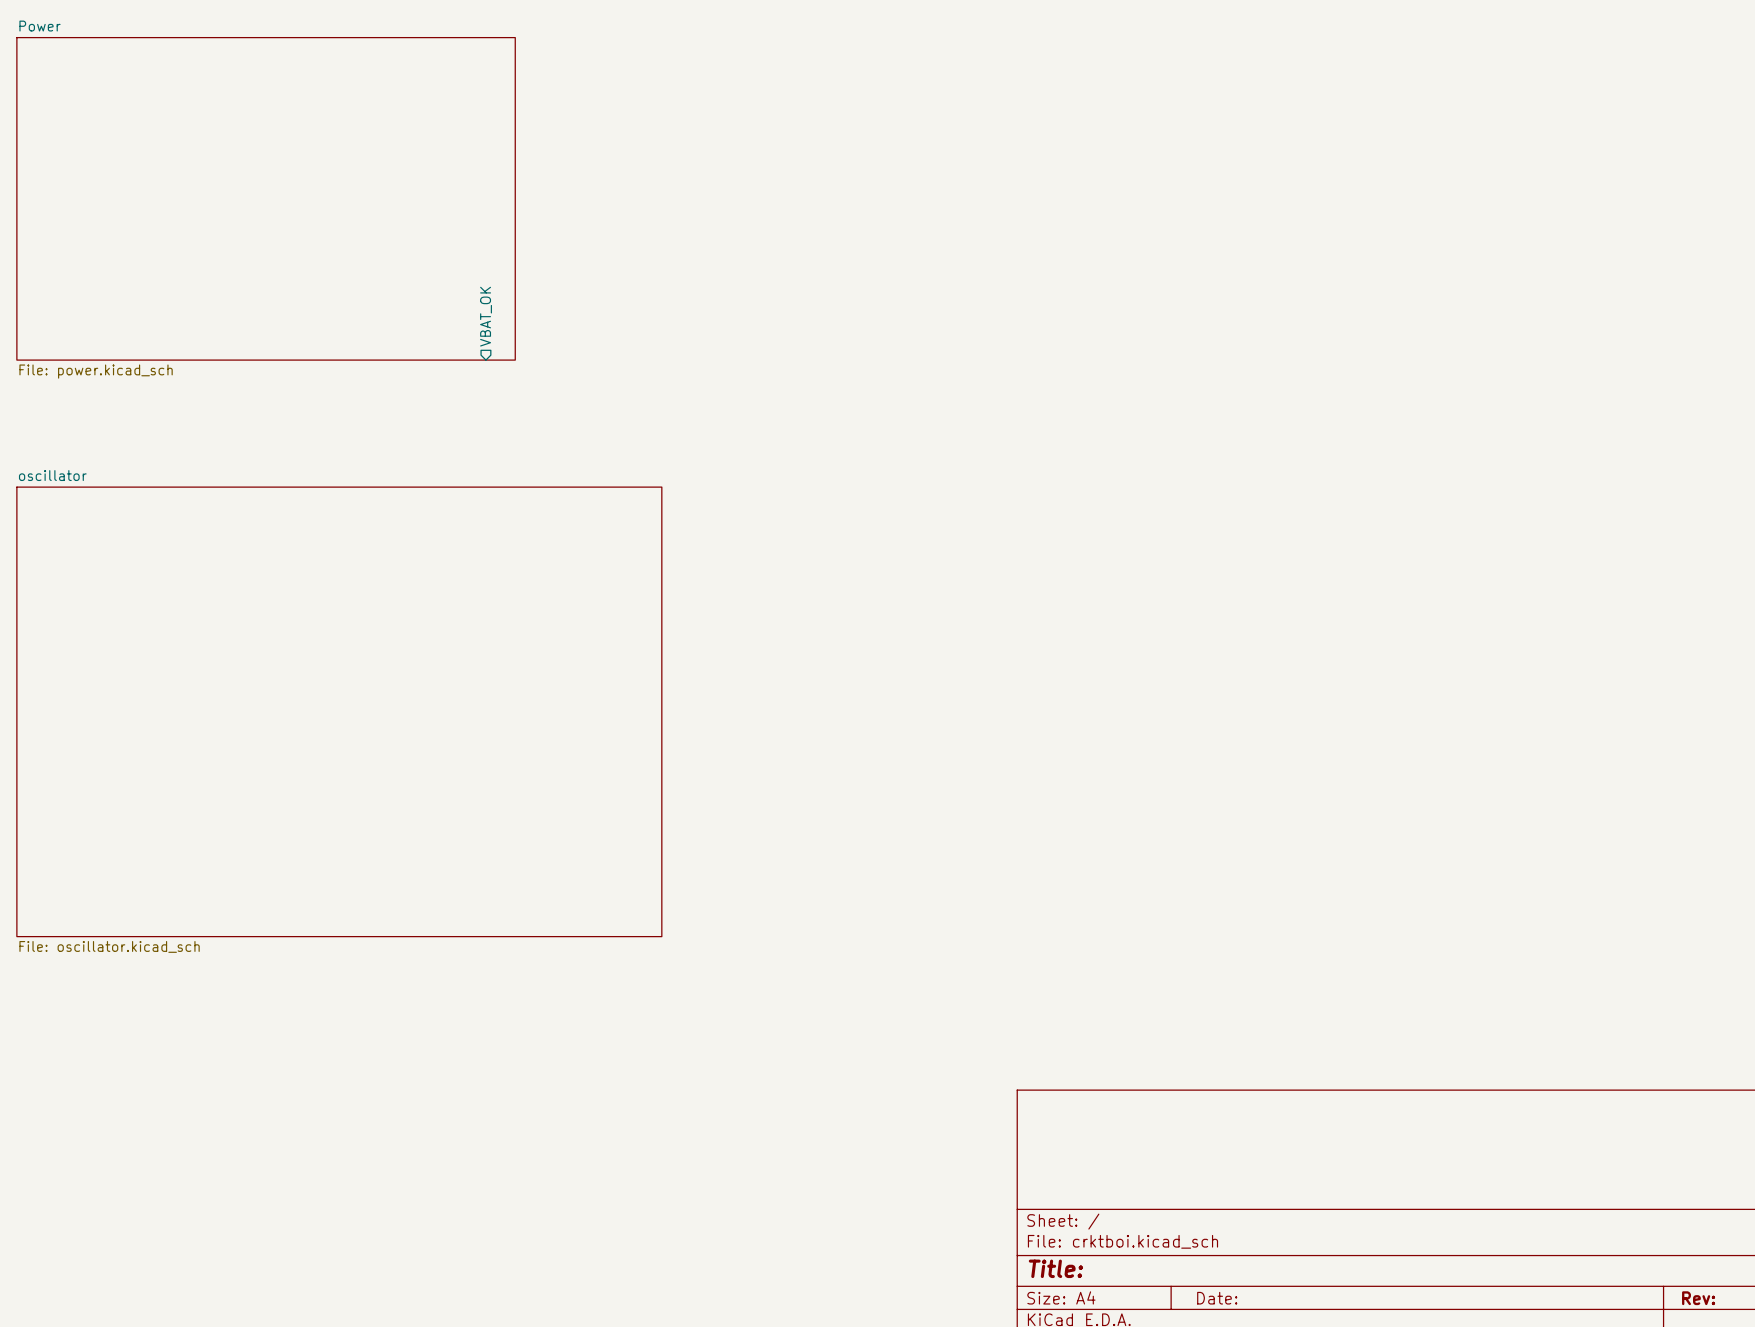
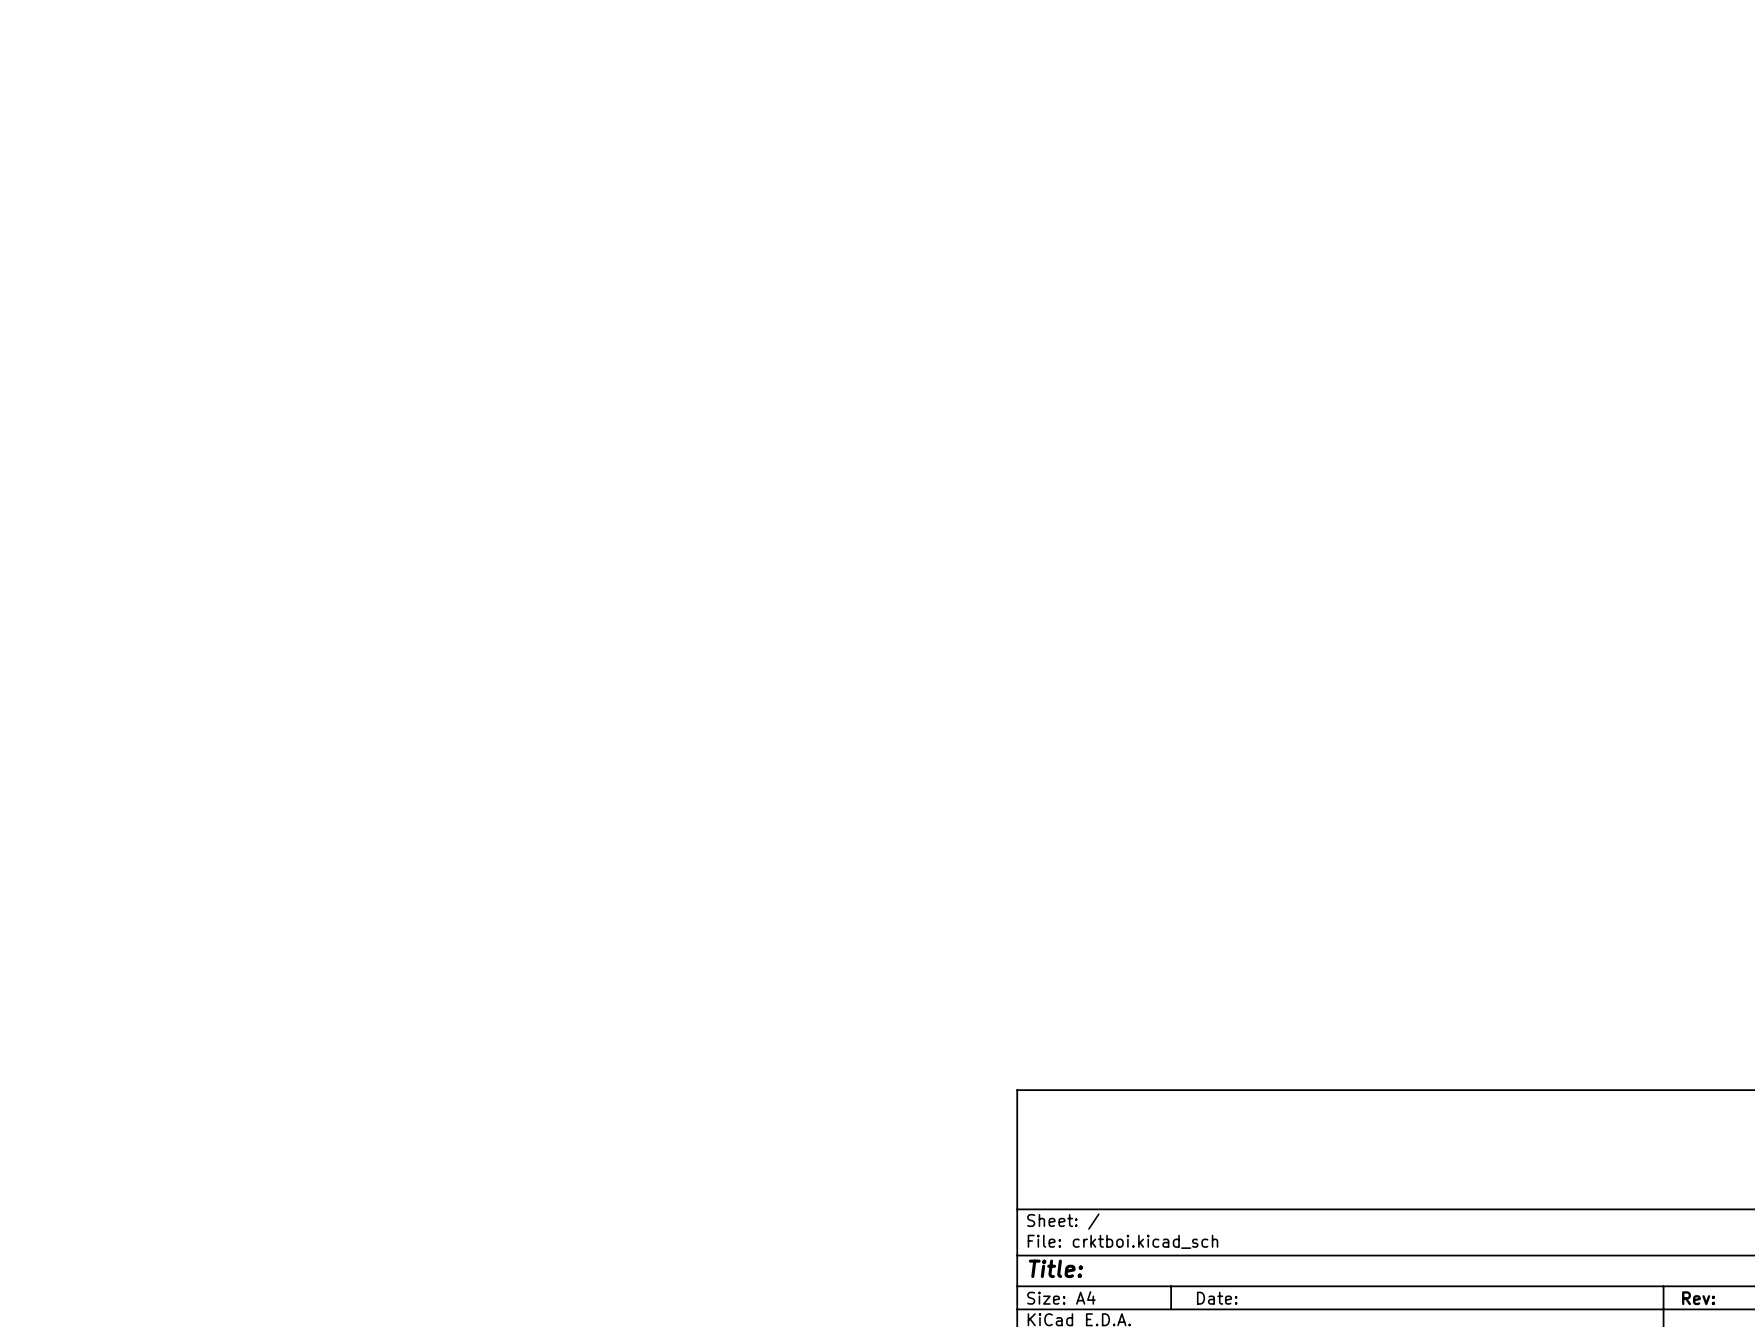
sheet Power: File: power.kicad_sch (266, 198) -> none
sheet pin: VBAT_OK (486, 316) -> none
sheet oscillator: File: oscillator.kicad_sch (339, 711) -> none

